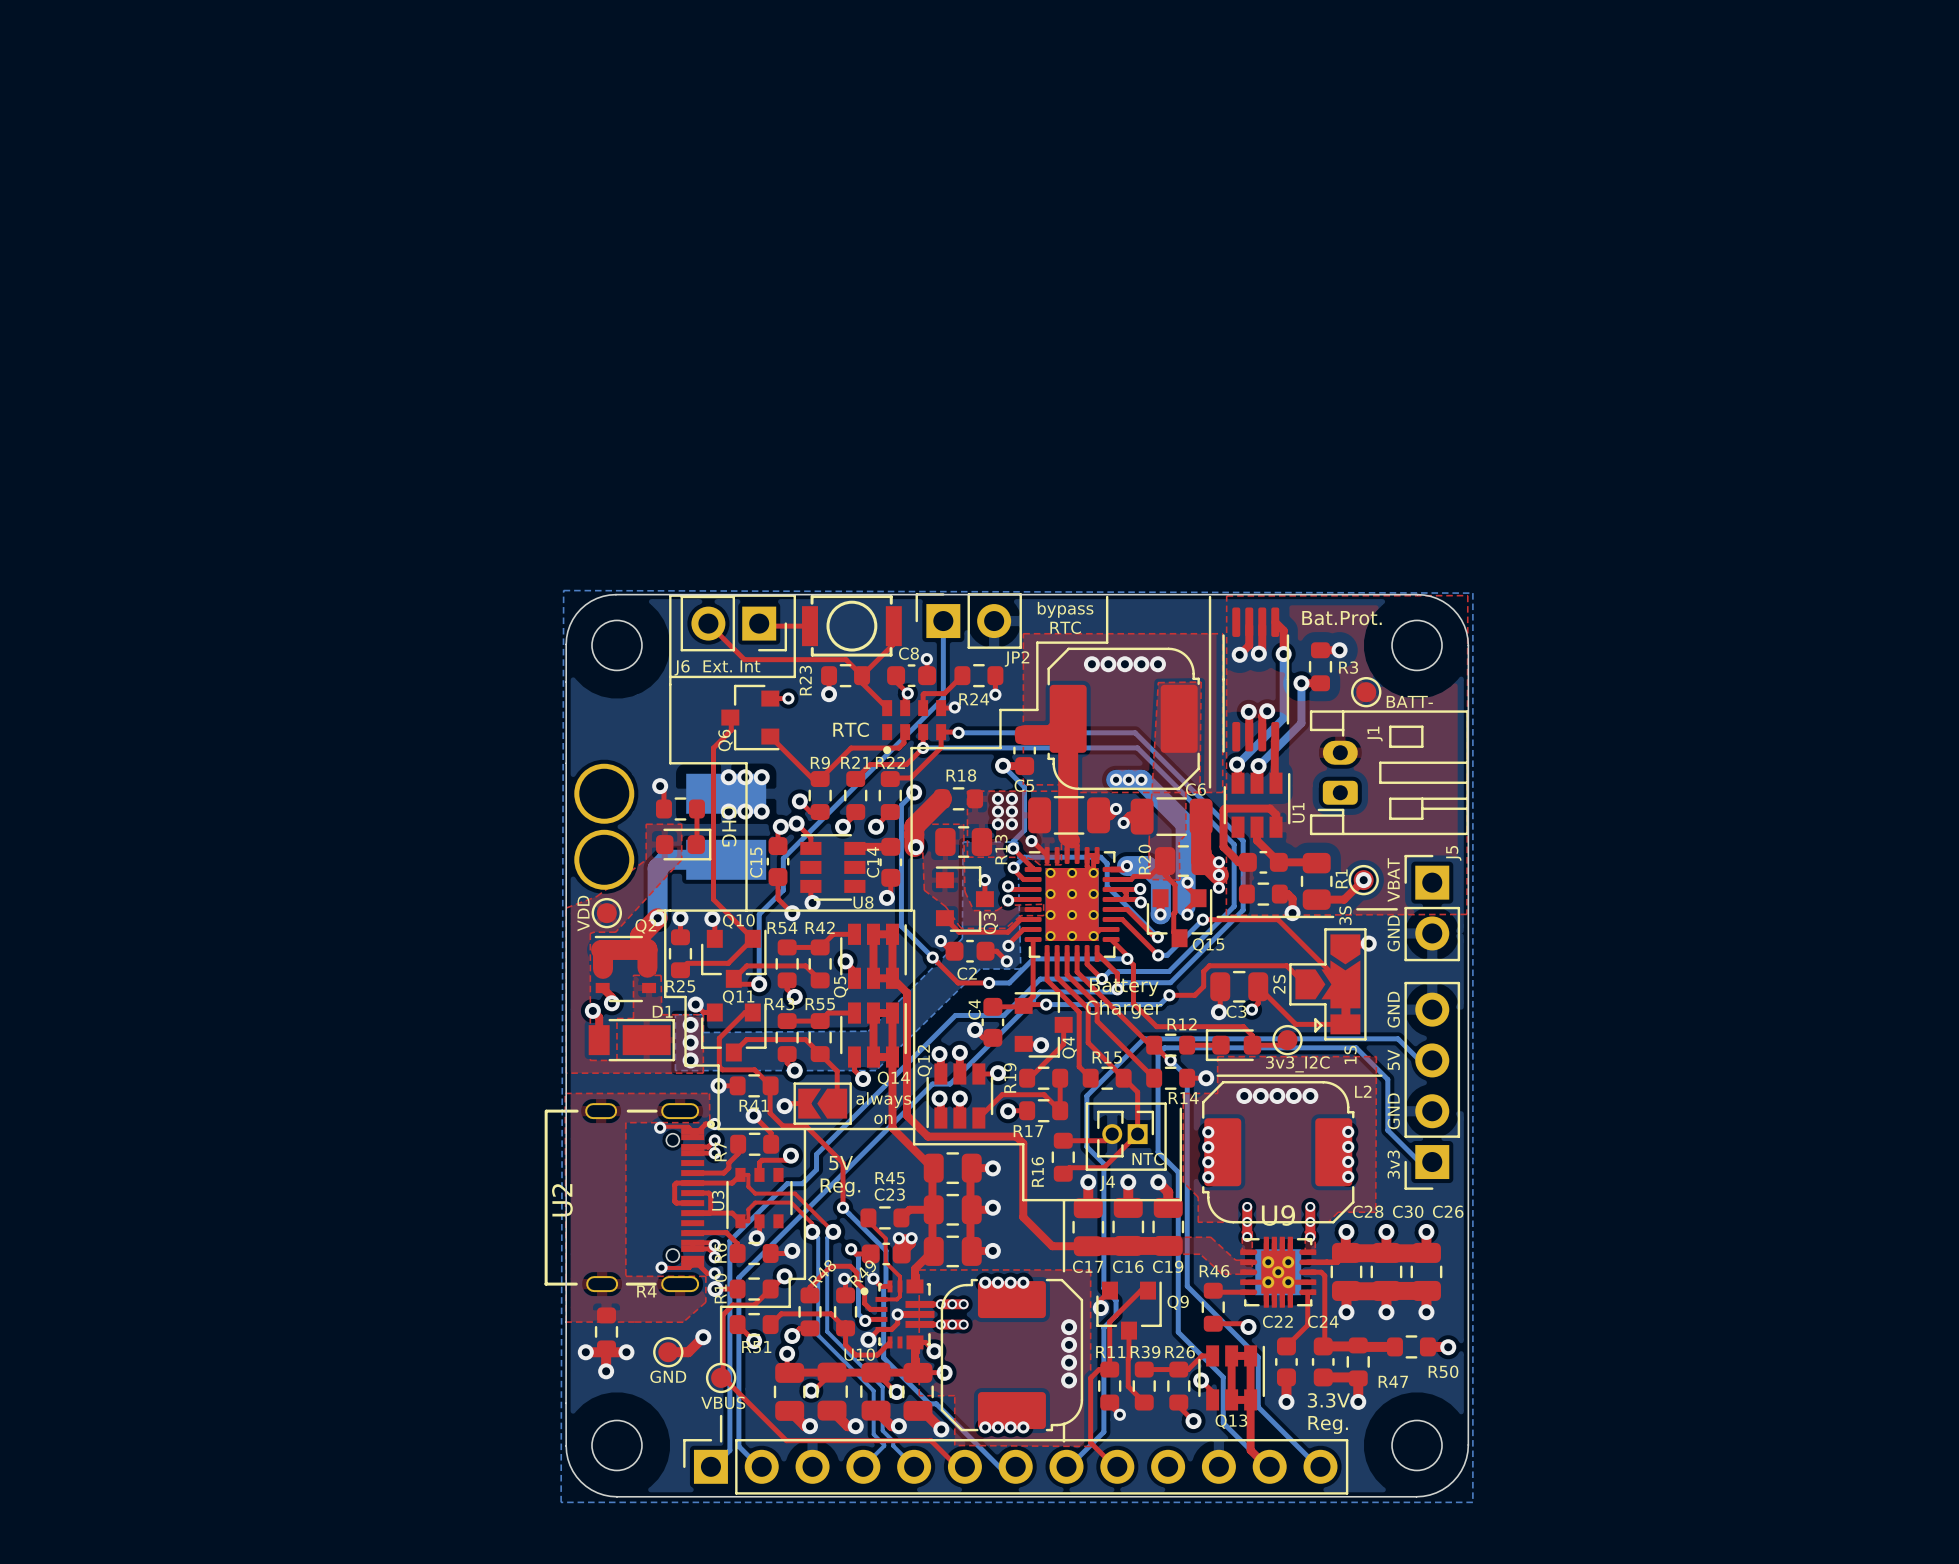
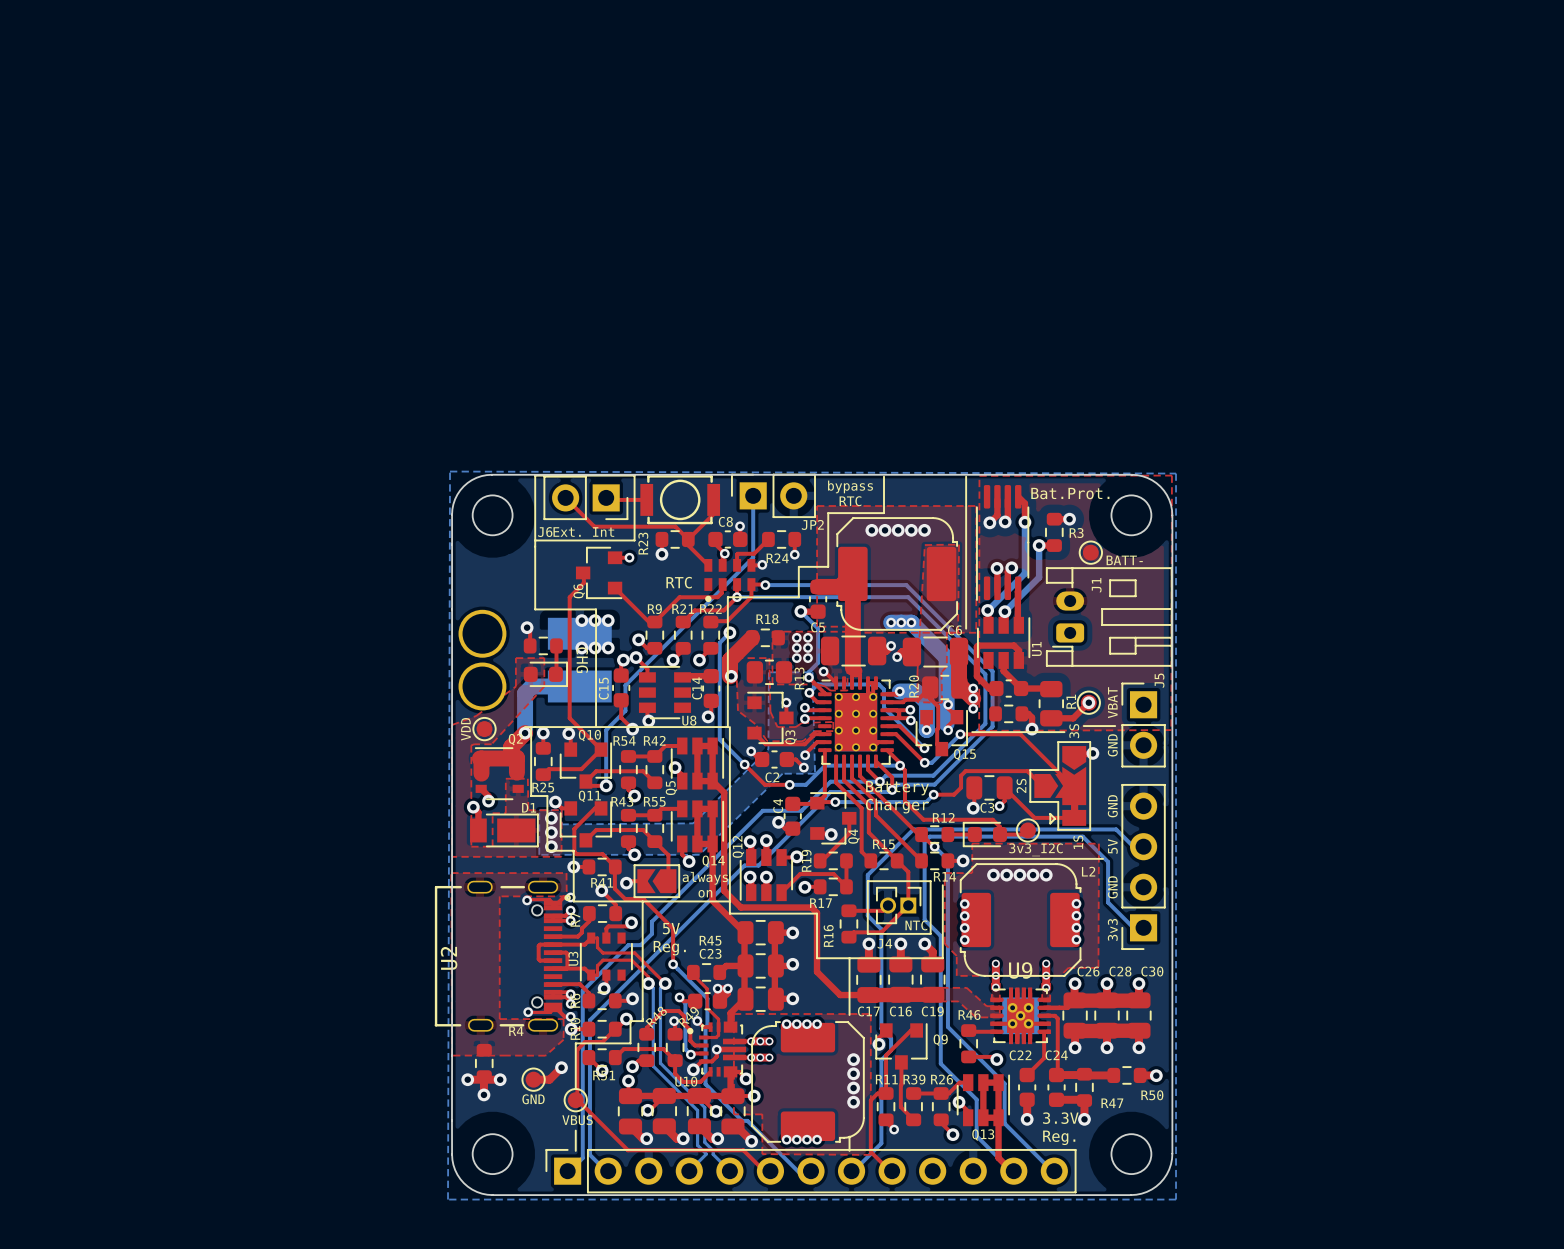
C28 name: C28 (1368, 1211) -> C26 (1088, 971)
C30 name: C30 (1408, 1211) -> C28 (1120, 971)
C26 name: C26 (1448, 1211) -> C30 (1152, 971)

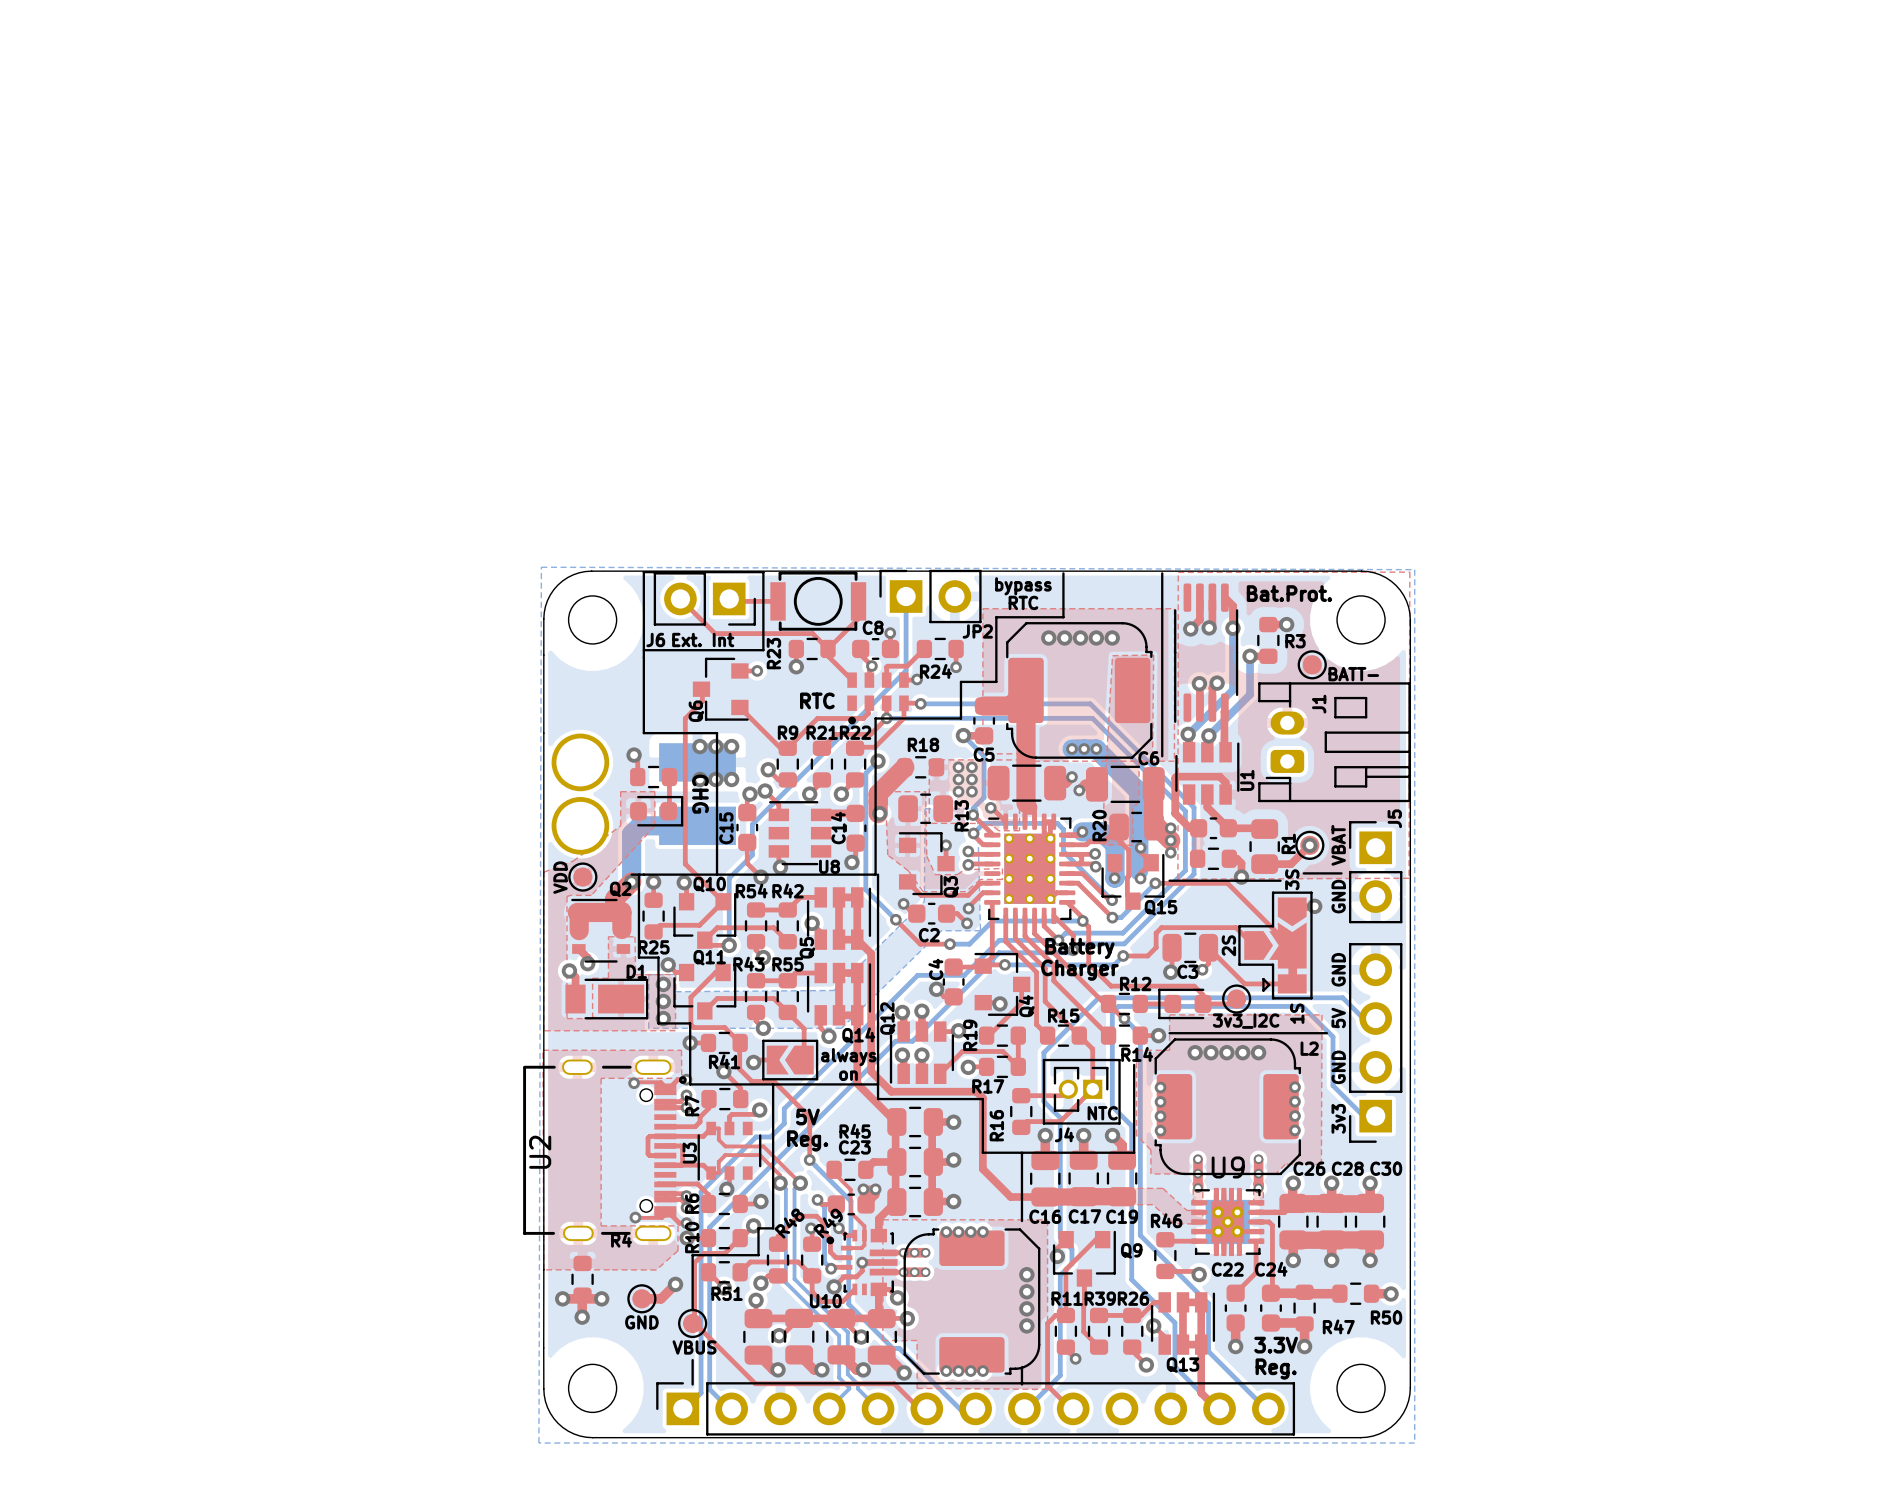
C17 name: C17 (868, 1011) -> C16 (1045, 1216)
C16 name: C16 (900, 1011) -> C17 (1084, 1216)

